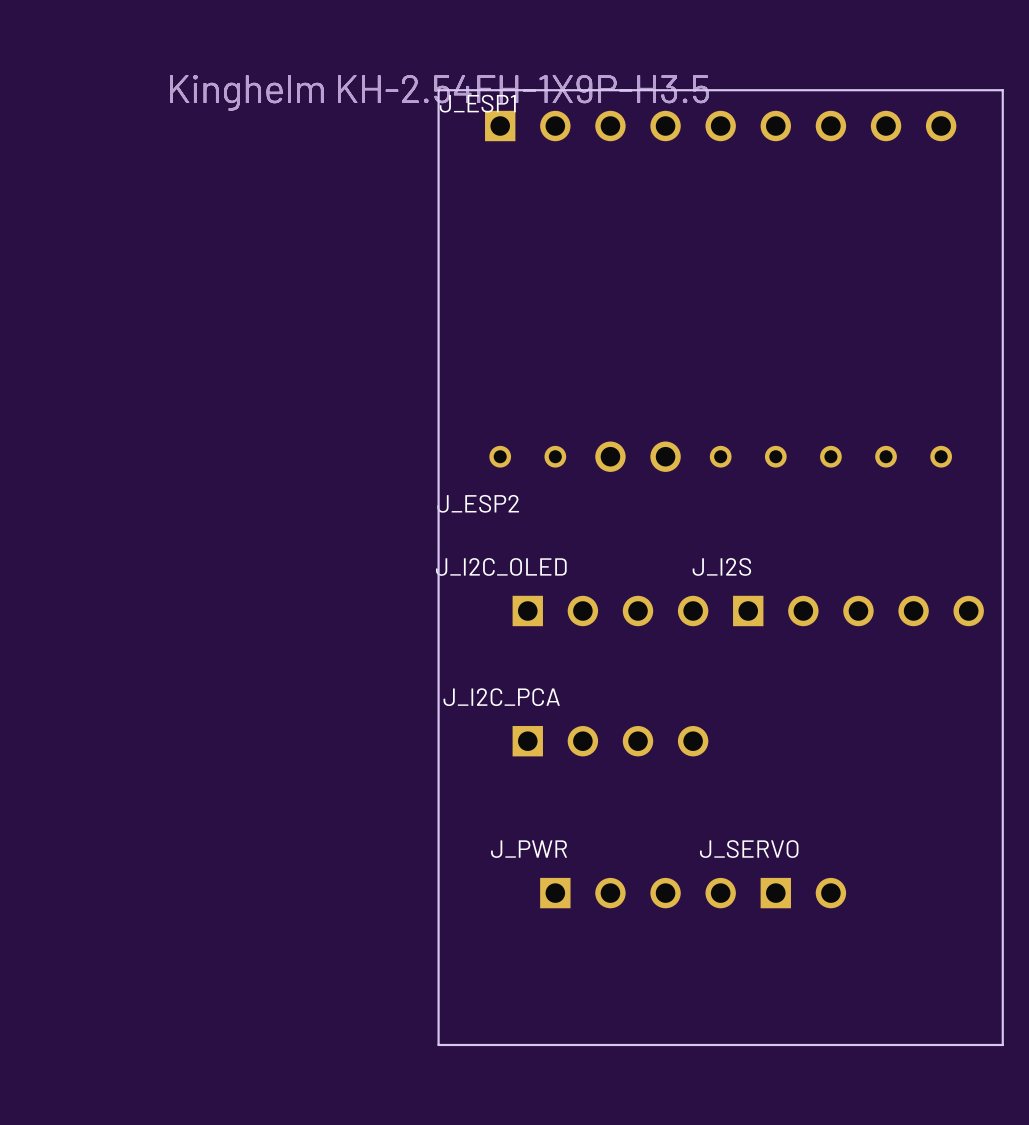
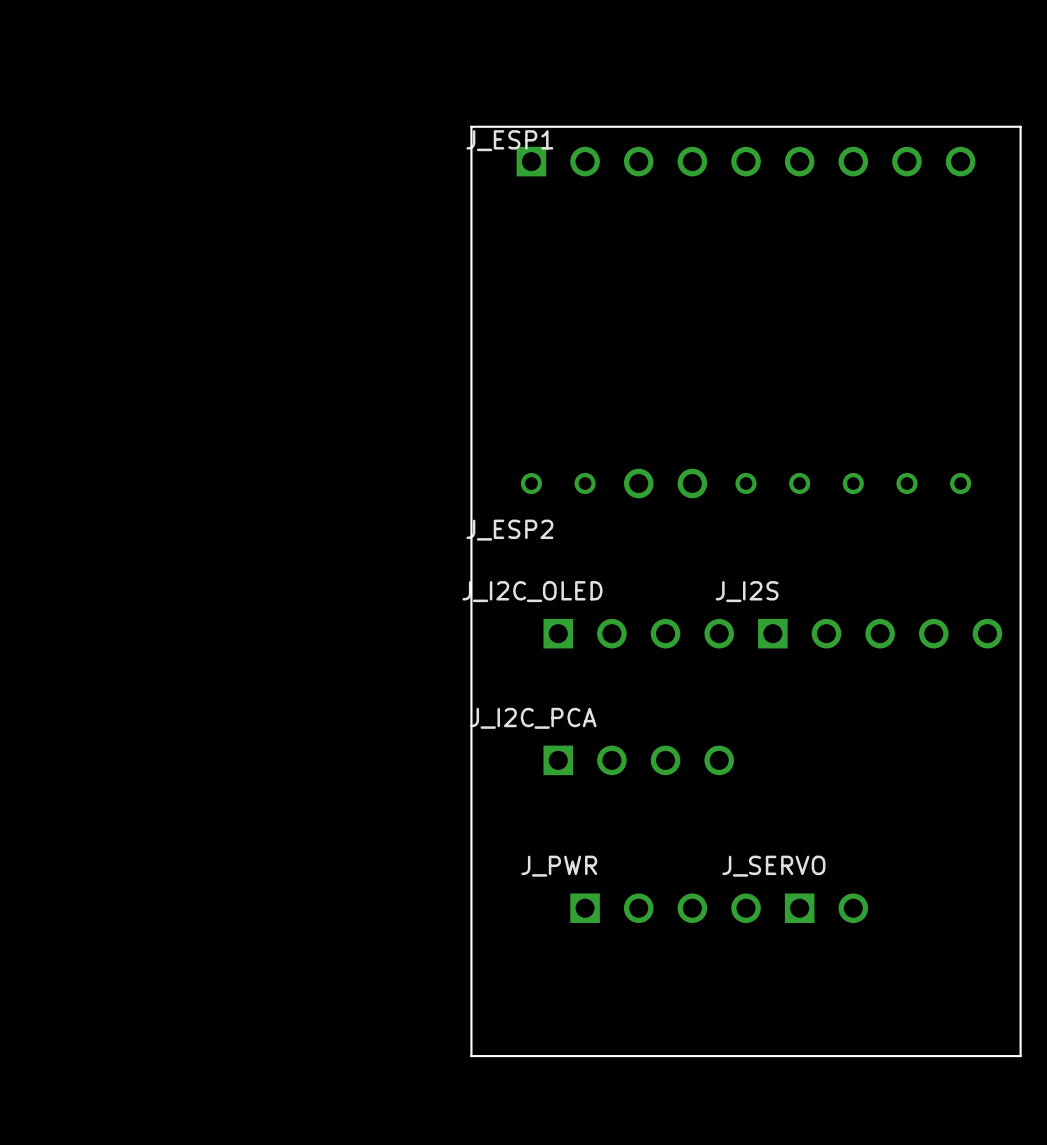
J_ESP1 value: Kinghelm KH-2.54FH-1X9P-H3.5 (439, 92) -> none
J_ESP2 value: Kinghelm KH-2.54FH-1X9P-H3.5 (439, 92) -> none

